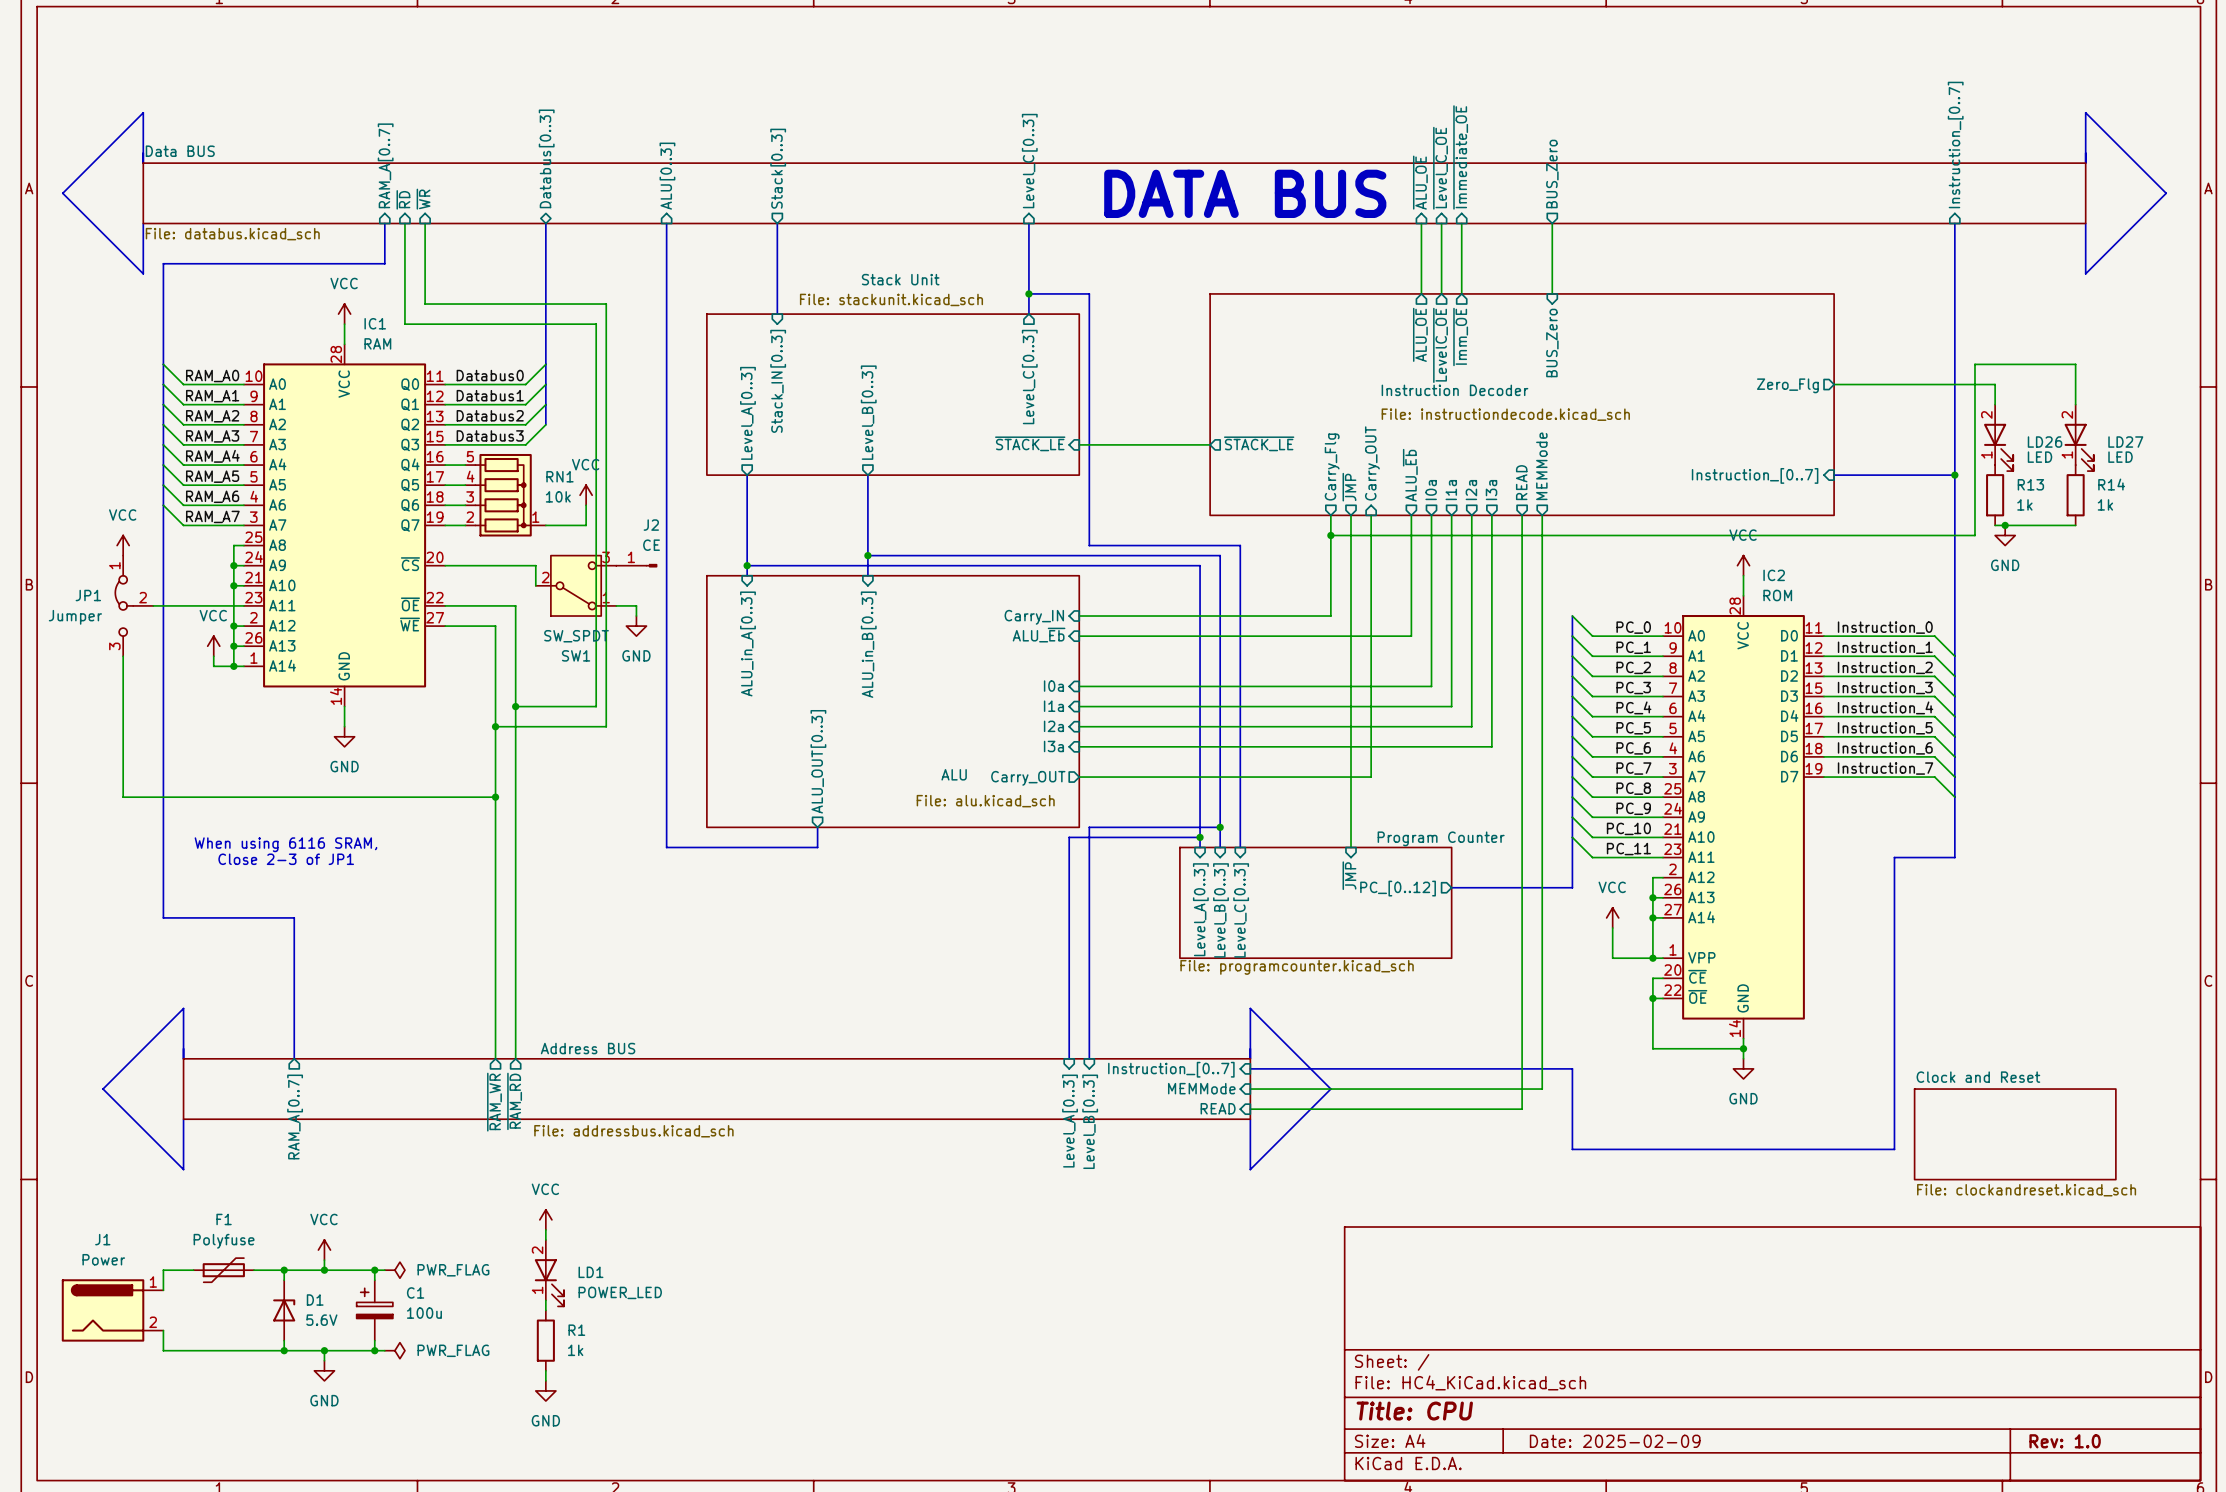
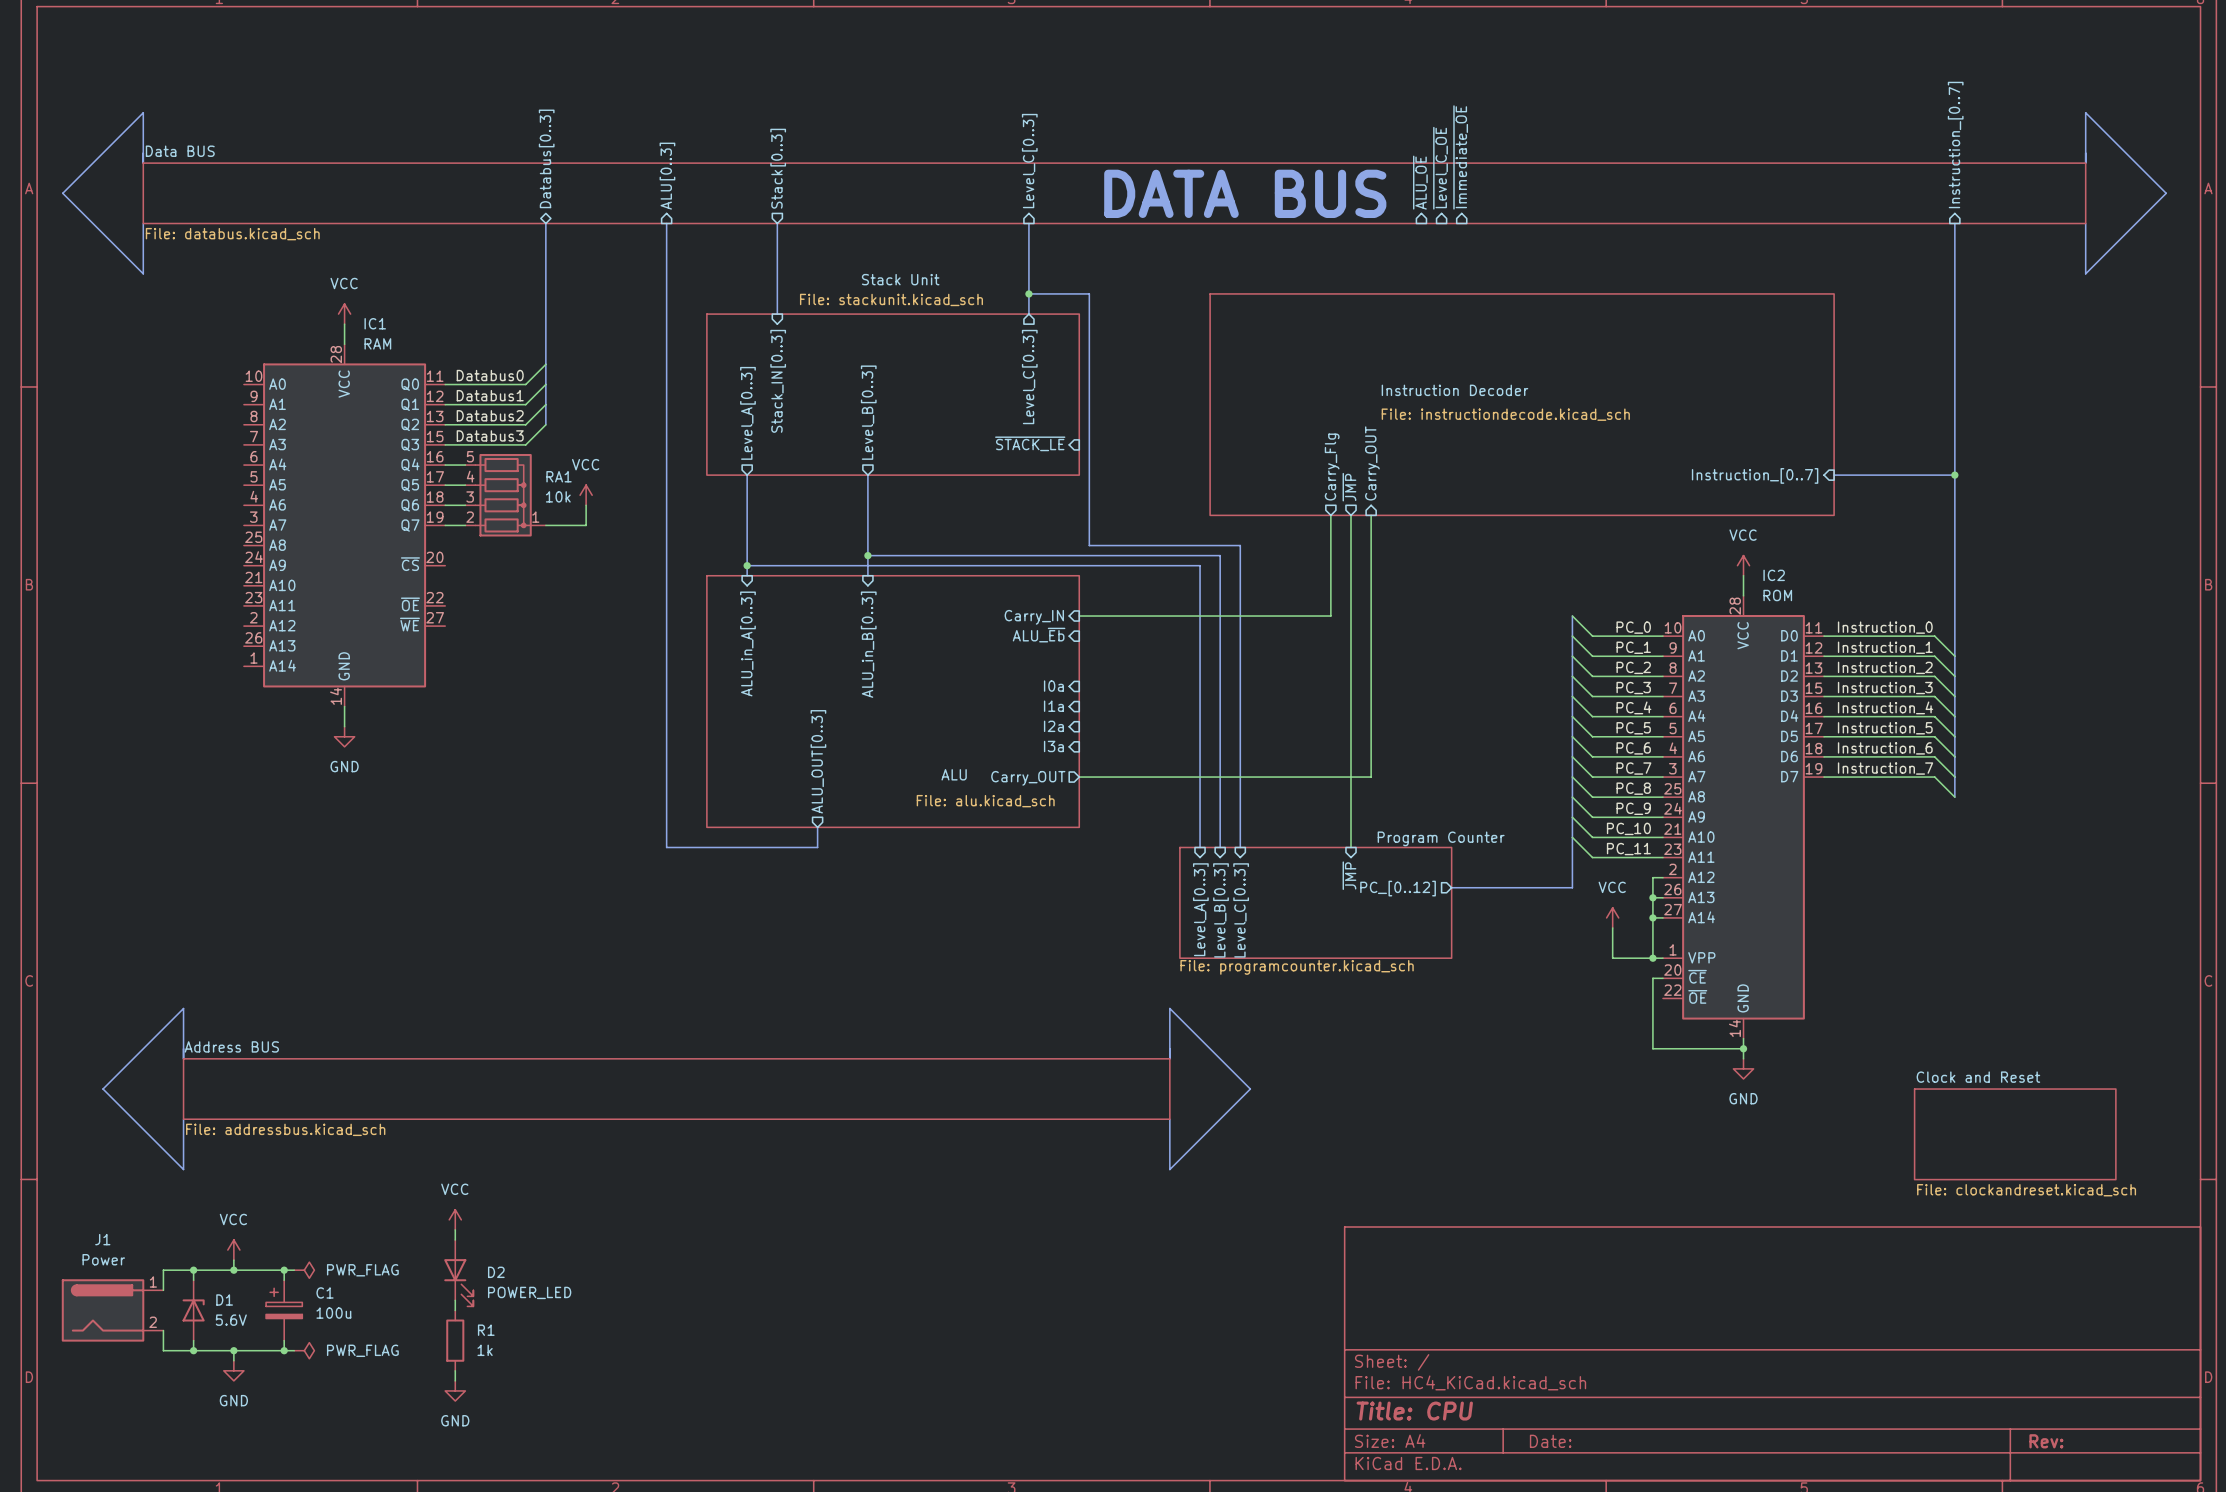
sheet pin: RAM_A[0..7] (385, 165) -> none
sheet pin: BUS_Zero (1552, 173) -> none
sheet pin: ~{RD} (403, 199) -> none
sheet pin: ~{WR} (423, 199) -> none
bus: (384, 223) (384, 263) (163, 263) (163, 917) (294, 917) (294, 1058) -> none
wire: (404, 223) (404, 324) (596, 324) (596, 706) (515, 706) -> none
wire: (425, 223) (425, 304) (606, 304) (606, 726) (495, 726) -> none
wire: (1421, 223) (1421, 293) -> none
wire: (1441, 223) (1441, 293) -> none
wire: (1461, 223) (1461, 293) -> none
wire: (1552, 223) (1552, 293) -> none
sheet pin: ~{ALU_OE} (1420, 334) -> none
sheet pin: ~{Imm_OE} (1460, 337) -> none
sheet pin: BUS_Zero (1552, 342) -> none
sheet pin: ~{LevelC_OE} (1440, 345) -> none
wire: (163, 364) (183, 384) (243, 384) -> none
label: RAM_A0 (212, 376) -> none
wire: (163, 384) (183, 404) (243, 404) -> none
wire: (1834, 384) (1995, 384) (1995, 404) -> none
sheet pin: Zero_Flg (1787, 385) -> none
label: RAM_A1 (212, 396) -> none
wire: (163, 404) (183, 424) (243, 424) -> none
wire: (2075, 404) (2075, 364) (1974, 364) (1974, 535) (1330, 535) -> none
label: RAM_A2 (212, 416) -> none
wire: (163, 424) (183, 444) (243, 444) -> none
label: RAM_A3 (212, 436) -> none
LD26: LED (1998, 437) -> none
LD27: LED (2079, 437) -> none
sheet pin: ~{STACK_LE} (1259, 443) -> none
wire: (163, 444) (183, 465) (243, 465) -> none
wire: (1079, 444) (1210, 444) -> none
label: RAM_A4 (212, 456) -> none
wire: (163, 465) (183, 485) (243, 485) -> none
sheet pin: MEMMode (1541, 466) -> none
sheet pin: ALU_~{Eb} (1410, 475) -> none
label: RAM_A5 (212, 476) -> none
RN1 name: RN1 (559, 476) -> RA1 (559, 476)
sheet pin: READ (1521, 482) -> none
wire: (163, 485) (183, 505) (243, 505) -> none
sheet pin: I0a (1431, 490) -> none
sheet pin: I1a (1451, 490) -> none
sheet pin: I2a (1471, 490) -> none
sheet pin: I3a (1491, 490) -> none
R13: 1k (1995, 495) -> none
R14: 1k (2075, 495) -> none
label: RAM_A6 (212, 496) -> none
wire: (163, 505) (183, 525) (243, 525) -> none
wire: (1411, 515) (1411, 636) (1079, 636) -> none
wire: (1431, 515) (1431, 686) (1079, 686) -> none
wire: (1451, 515) (1451, 706) (1079, 706) -> none
wire: (1471, 515) (1471, 726) (1079, 726) -> none
wire: (1491, 515) (1491, 746) (1079, 746) -> none
wire: (1522, 515) (1522, 1109) (1250, 1109) -> none
wire: (1542, 515) (1542, 1089) (1250, 1089) -> none
label: RAM_A7 (212, 516) -> none
wire: (1995, 525) (2075, 525) -> none
junction: (2005, 525) -> none
junction: (1330, 535) -> none
power symbol: GND (2005, 535) -> none
power symbol: VCC (123, 545) -> none
wire: (243, 545) (233, 545) (233, 666) -> none
wire: (233, 565) (243, 565) -> none
junction: (233, 565) -> none
wire: (445, 565) (535, 565) (535, 585) -> none
J2: CE (636, 565) -> none
wire: (233, 585) (243, 585) -> none
junction: (233, 585) -> none
SW1: SW_SPDT (576, 585) -> none
JP1: Jumper (134, 605) -> none
wire: (153, 605) (243, 605) -> none
wire: (445, 605) (515, 605) (515, 1058) -> none
wire: (616, 605) (636, 605) (636, 616) -> none
wire: (233, 626) (243, 626) -> none
junction: (233, 626) -> none
wire: (445, 626) (495, 626) (495, 1058) -> none
power symbol: GND (636, 626) -> none
power symbol: VCC (213, 646) -> none
wire: (233, 646) (243, 646) -> none
junction: (233, 646) -> none
wire: (123, 656) (123, 797) (495, 797) -> none
wire: (213, 656) (213, 666) (243, 666) -> none
junction: (233, 666) -> none
junction: (515, 706) -> none
junction: (495, 726) -> none
junction: (495, 797) -> none
bus: (1954, 797) (1954, 857) (1894, 857) (1894, 1149) (1572, 1149) (1572, 1068) (1250, 1068) -> none
bus: (1220, 827) (1089, 827) (1089, 1058) -> none
junction: (1220, 827) -> none
bus: (1200, 837) (1069, 837) (1069, 1058) -> none
junction: (1200, 837) -> none
text: When using 6116 SRAM, (285, 844) -> none
text: Close 2-3 of JP1 (286, 859) -> none
wire: (1652, 998) (1662, 998) -> none
junction: (1652, 998) -> none
line: (1250, 1058) (1250, 1008) (1330, 1089) (1250, 1169) (1250, 1119) -> (1169, 1058) (1169, 1008) (1250, 1089) (1169, 1169) (1169, 1119)
sheet pin: Instruction_[0..7] (1171, 1069) -> none
sheet pin: MEMMode (1201, 1088) -> none
sheet Address BUS: none -> File: addressbus.kicad_sch (676, 1089)
sheet Address BUS: File: addressbus.kicad_sch (716, 1089) -> none
sheet pin: ~{RAM_RD} (514, 1101) -> none
sheet pin: ~{RAM_WR} (494, 1102) -> none
sheet pin: READ (1218, 1108) -> none
sheet pin: RAM_A[0..7] (295, 1116) -> none
sheet pin: Level_A[0..3] (1070, 1121) -> none
sheet pin: Level_B[0..3] (1090, 1121) -> none
power symbol: none -> VCC (455, 1219)
power symbol: VCC (545, 1219) -> none
wire: (545, 1229) (545, 1239) -> (455, 1229) (455, 1239)
power symbol: none -> VCC (233, 1250)
power symbol: VCC (324, 1250) -> none
wire: (324, 1260) (324, 1270) -> (233, 1260) (233, 1270)
junction: none -> (193, 1270)
F1: Polyfuse (223, 1270) -> none
junction: none -> (233, 1270)
wire: (294, 1270) (384, 1270) -> none
power symbol: none -> PWR_FLAG (304, 1270)
junction: (324, 1270) -> none
wire: (374, 1270) (374, 1280) -> none
junction: (374, 1270) -> none
power symbol: PWR_FLAG (394, 1270) -> none
D2: none -> POWER_LED (458, 1273)
LD1: POWER_LED (549, 1273) -> none
wire: (545, 1300) (545, 1310) -> (455, 1300) (455, 1310)
D1 position: (284, 1310) -> (193, 1310)
C1 position: (374, 1310) -> (284, 1310)
wire: (374, 1340) (374, 1350) -> (193, 1340) (193, 1350)
R1 position: (545, 1340) -> (455, 1340)
junction: none -> (193, 1350)
junction: none -> (233, 1350)
wire: (294, 1350) (384, 1350) -> none
power symbol: none -> PWR_FLAG (304, 1350)
wire: (324, 1350) (324, 1360) -> (233, 1350) (233, 1360)
junction: (324, 1350) -> none
junction: (374, 1350) -> none
power symbol: PWR_FLAG (394, 1350) -> none
power symbol: none -> GND (233, 1370)
power symbol: GND (324, 1370) -> none
wire: (545, 1370) (545, 1380) -> (455, 1370) (455, 1380)
power symbol: none -> GND (455, 1390)
power symbol: GND (545, 1390) -> none
title block: Date: 2025-02-09 (1615, 1441) -> Date: (1550, 1441)
title block: Rev: 1.0 (2065, 1441) -> Rev: (2046, 1441)

